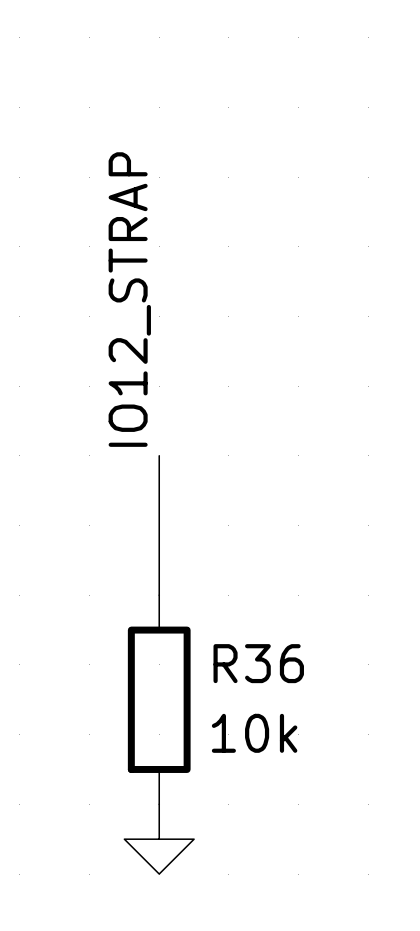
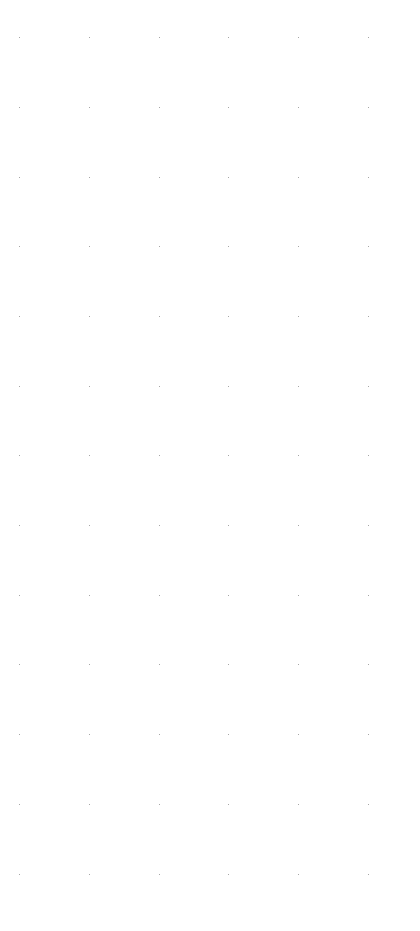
label: IO12_STRAP (129, 299) -> none
wire: (159, 455) (159, 595) -> none
R36: 10k (159, 699) -> none
power symbol: (159, 839) -> none

